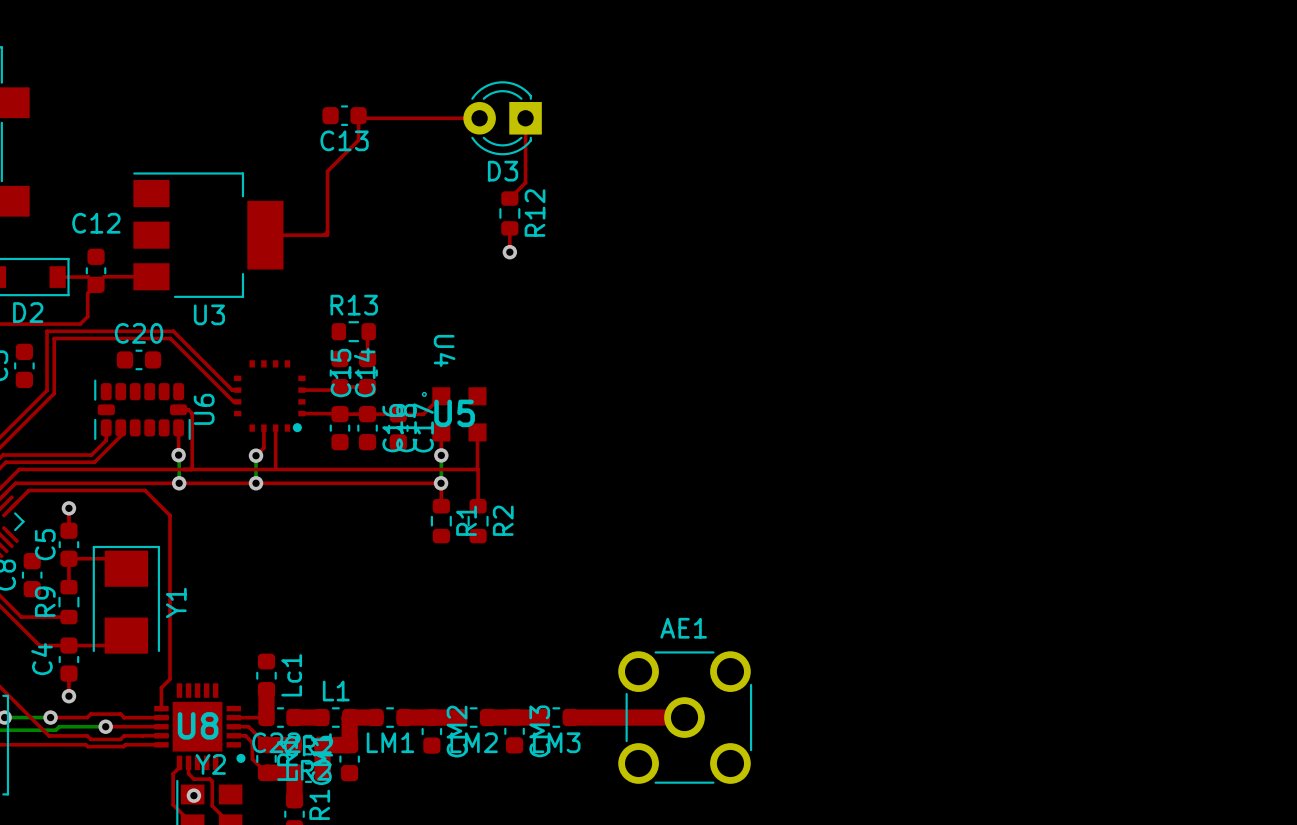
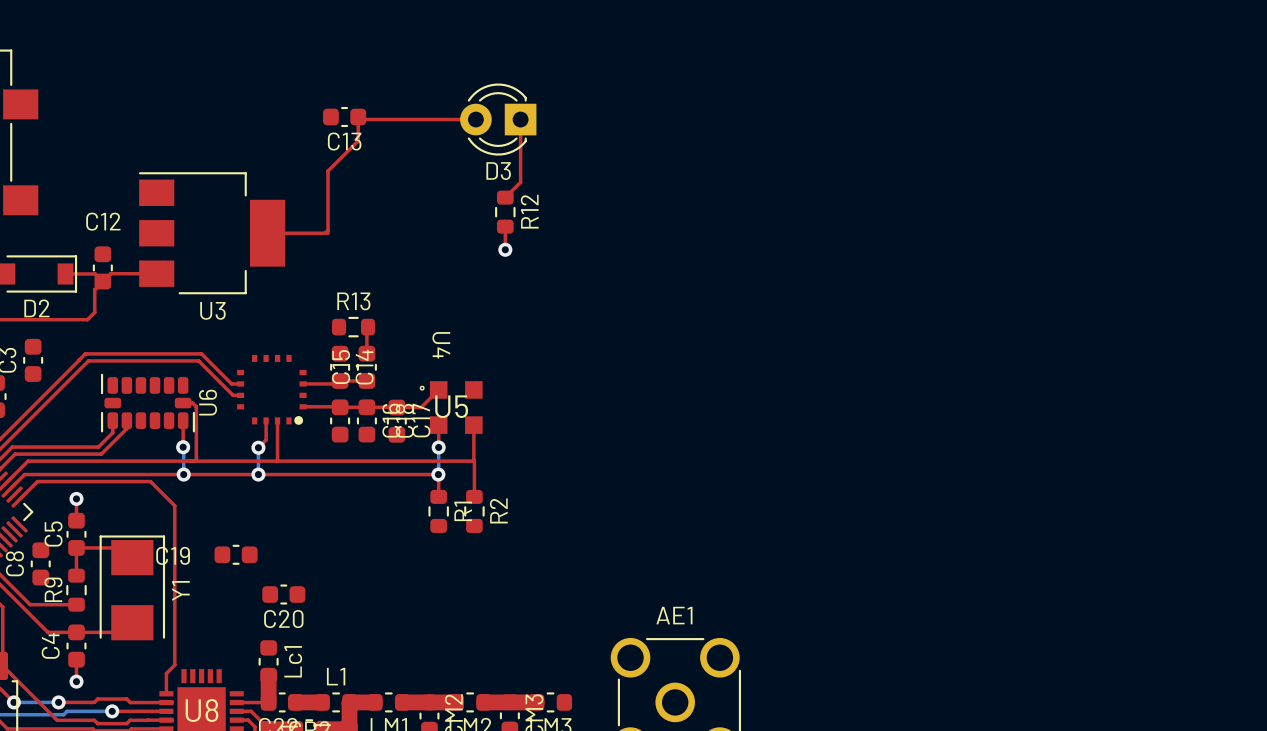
C20 name position: C20 (139, 333) -> C20 (283, 619)
C20 position: (139, 359) -> (283, 594)
top track: (232, 390) (173, 331) (47, 331) (47, 390) -> (235, 383) (231, 383) (201, 353) (85, 353) (55, 384)
top track: (54, 393) (54, 338) (170, 338) (233, 401) -> (62, 387) (88, 360) (198, 360) (233, 395) (236, 395)
C19: none -> (236, 554)
top track: (570, 717) (684, 717) -> none

